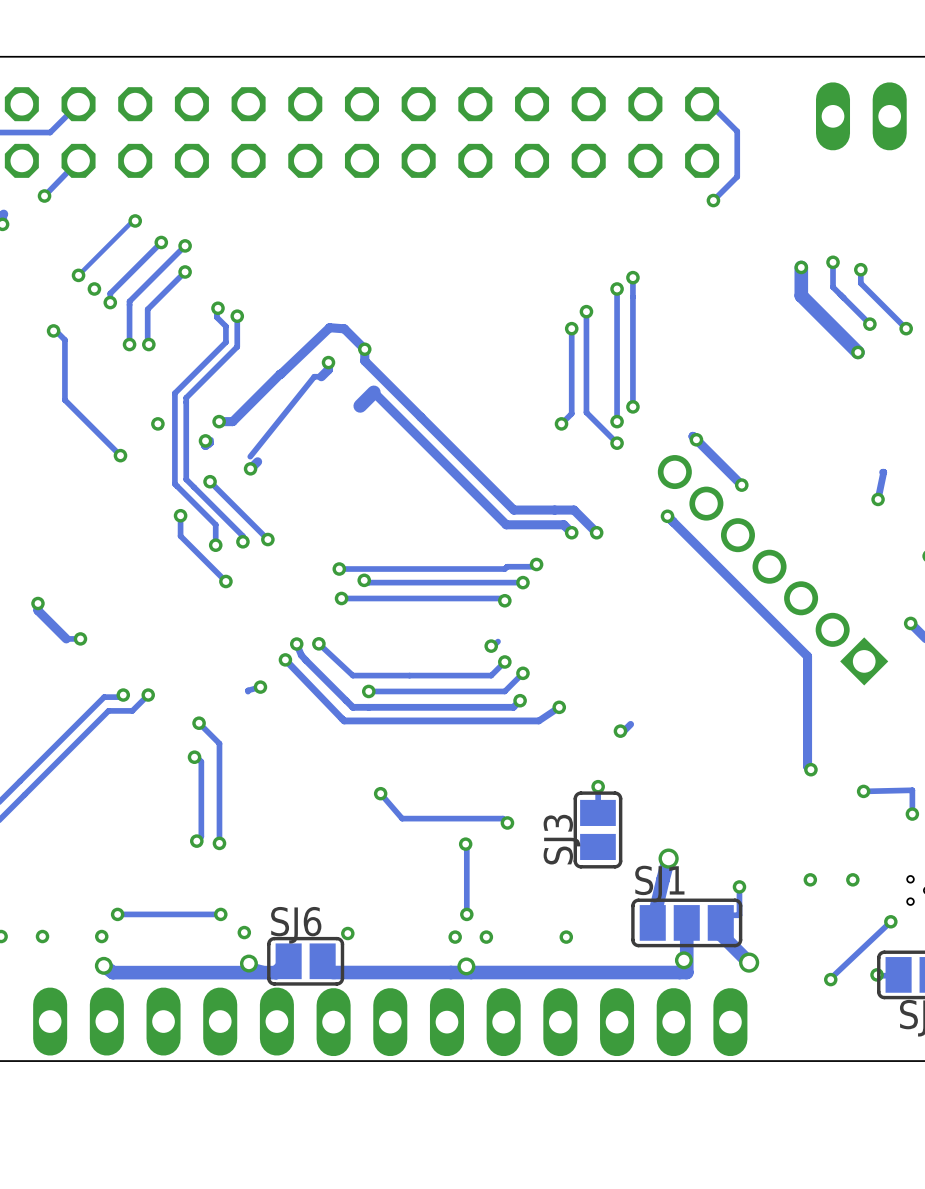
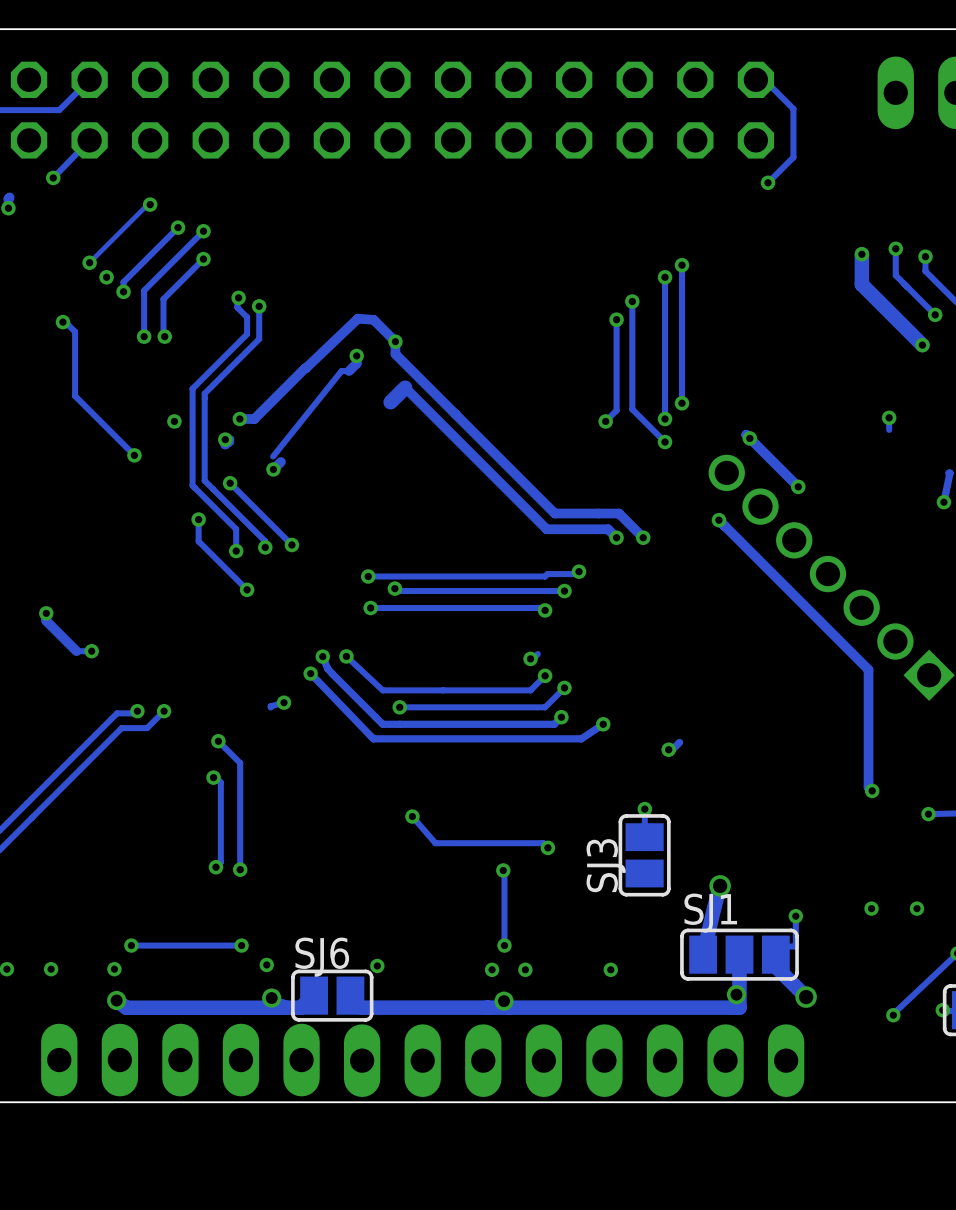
track: none -> (889, 417) (889, 429)
via: none -> (889, 417)

